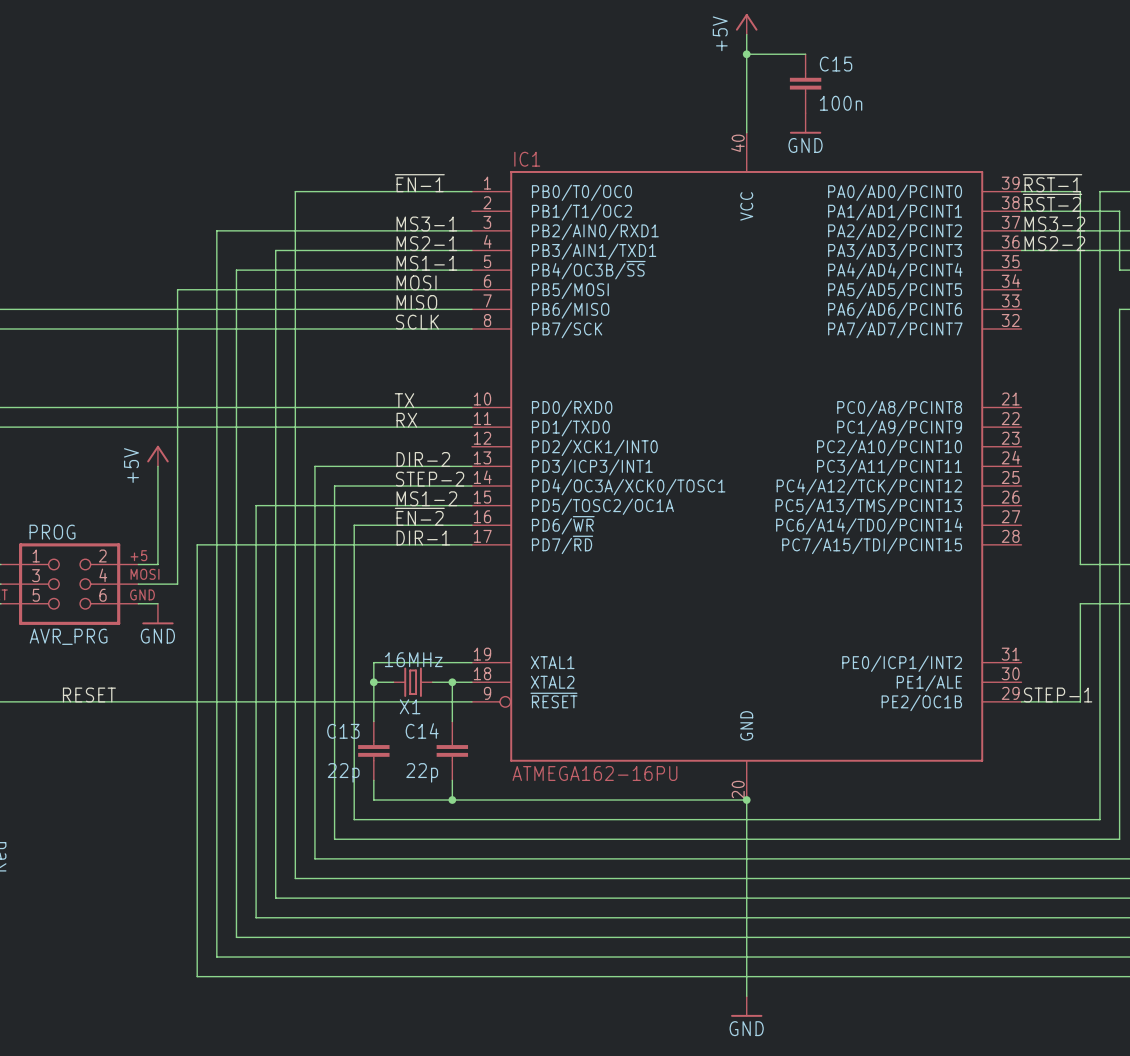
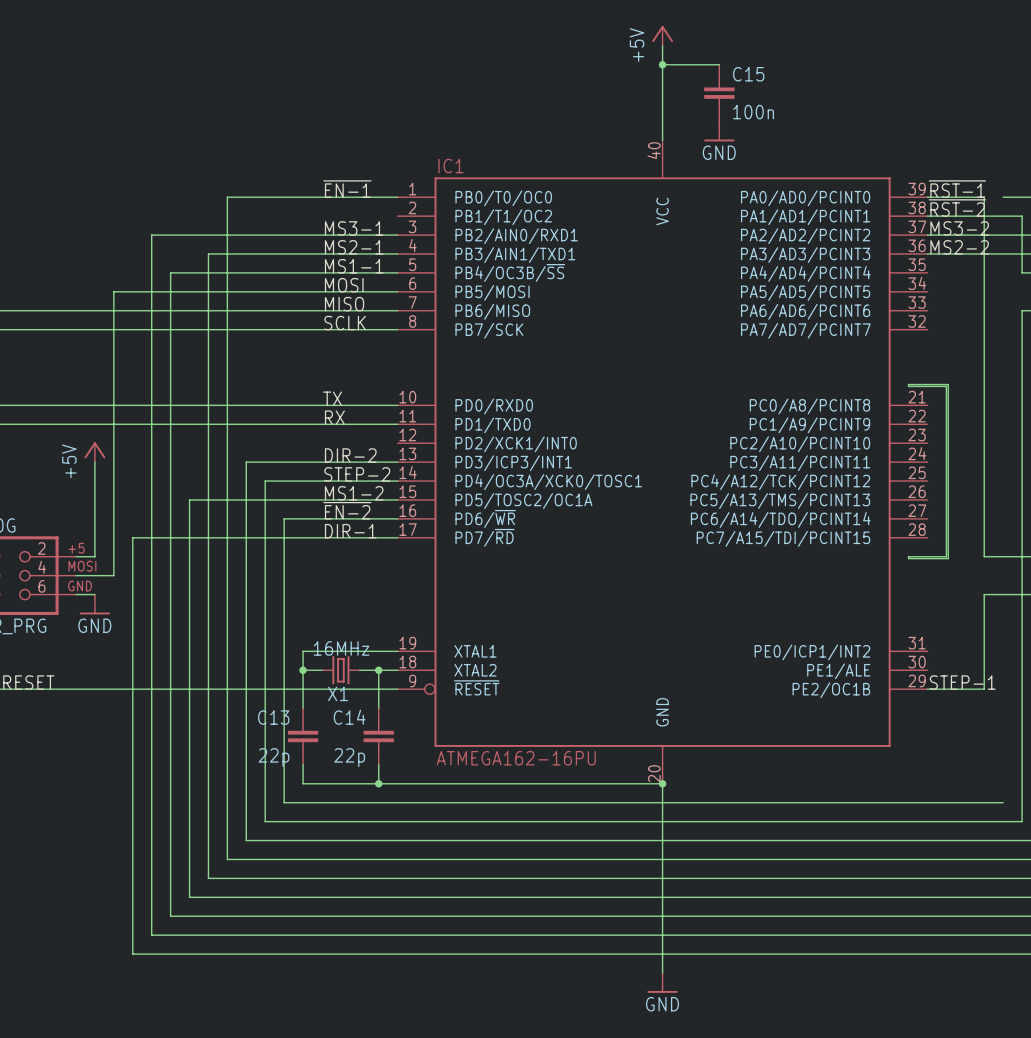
wire: (1099, 191) (1099, 819) -> none
wire: none -> (908, 384) (908, 386) (946, 386) (946, 556) (908, 556) (908, 558) (948, 558) (948, 384) (908, 384)

